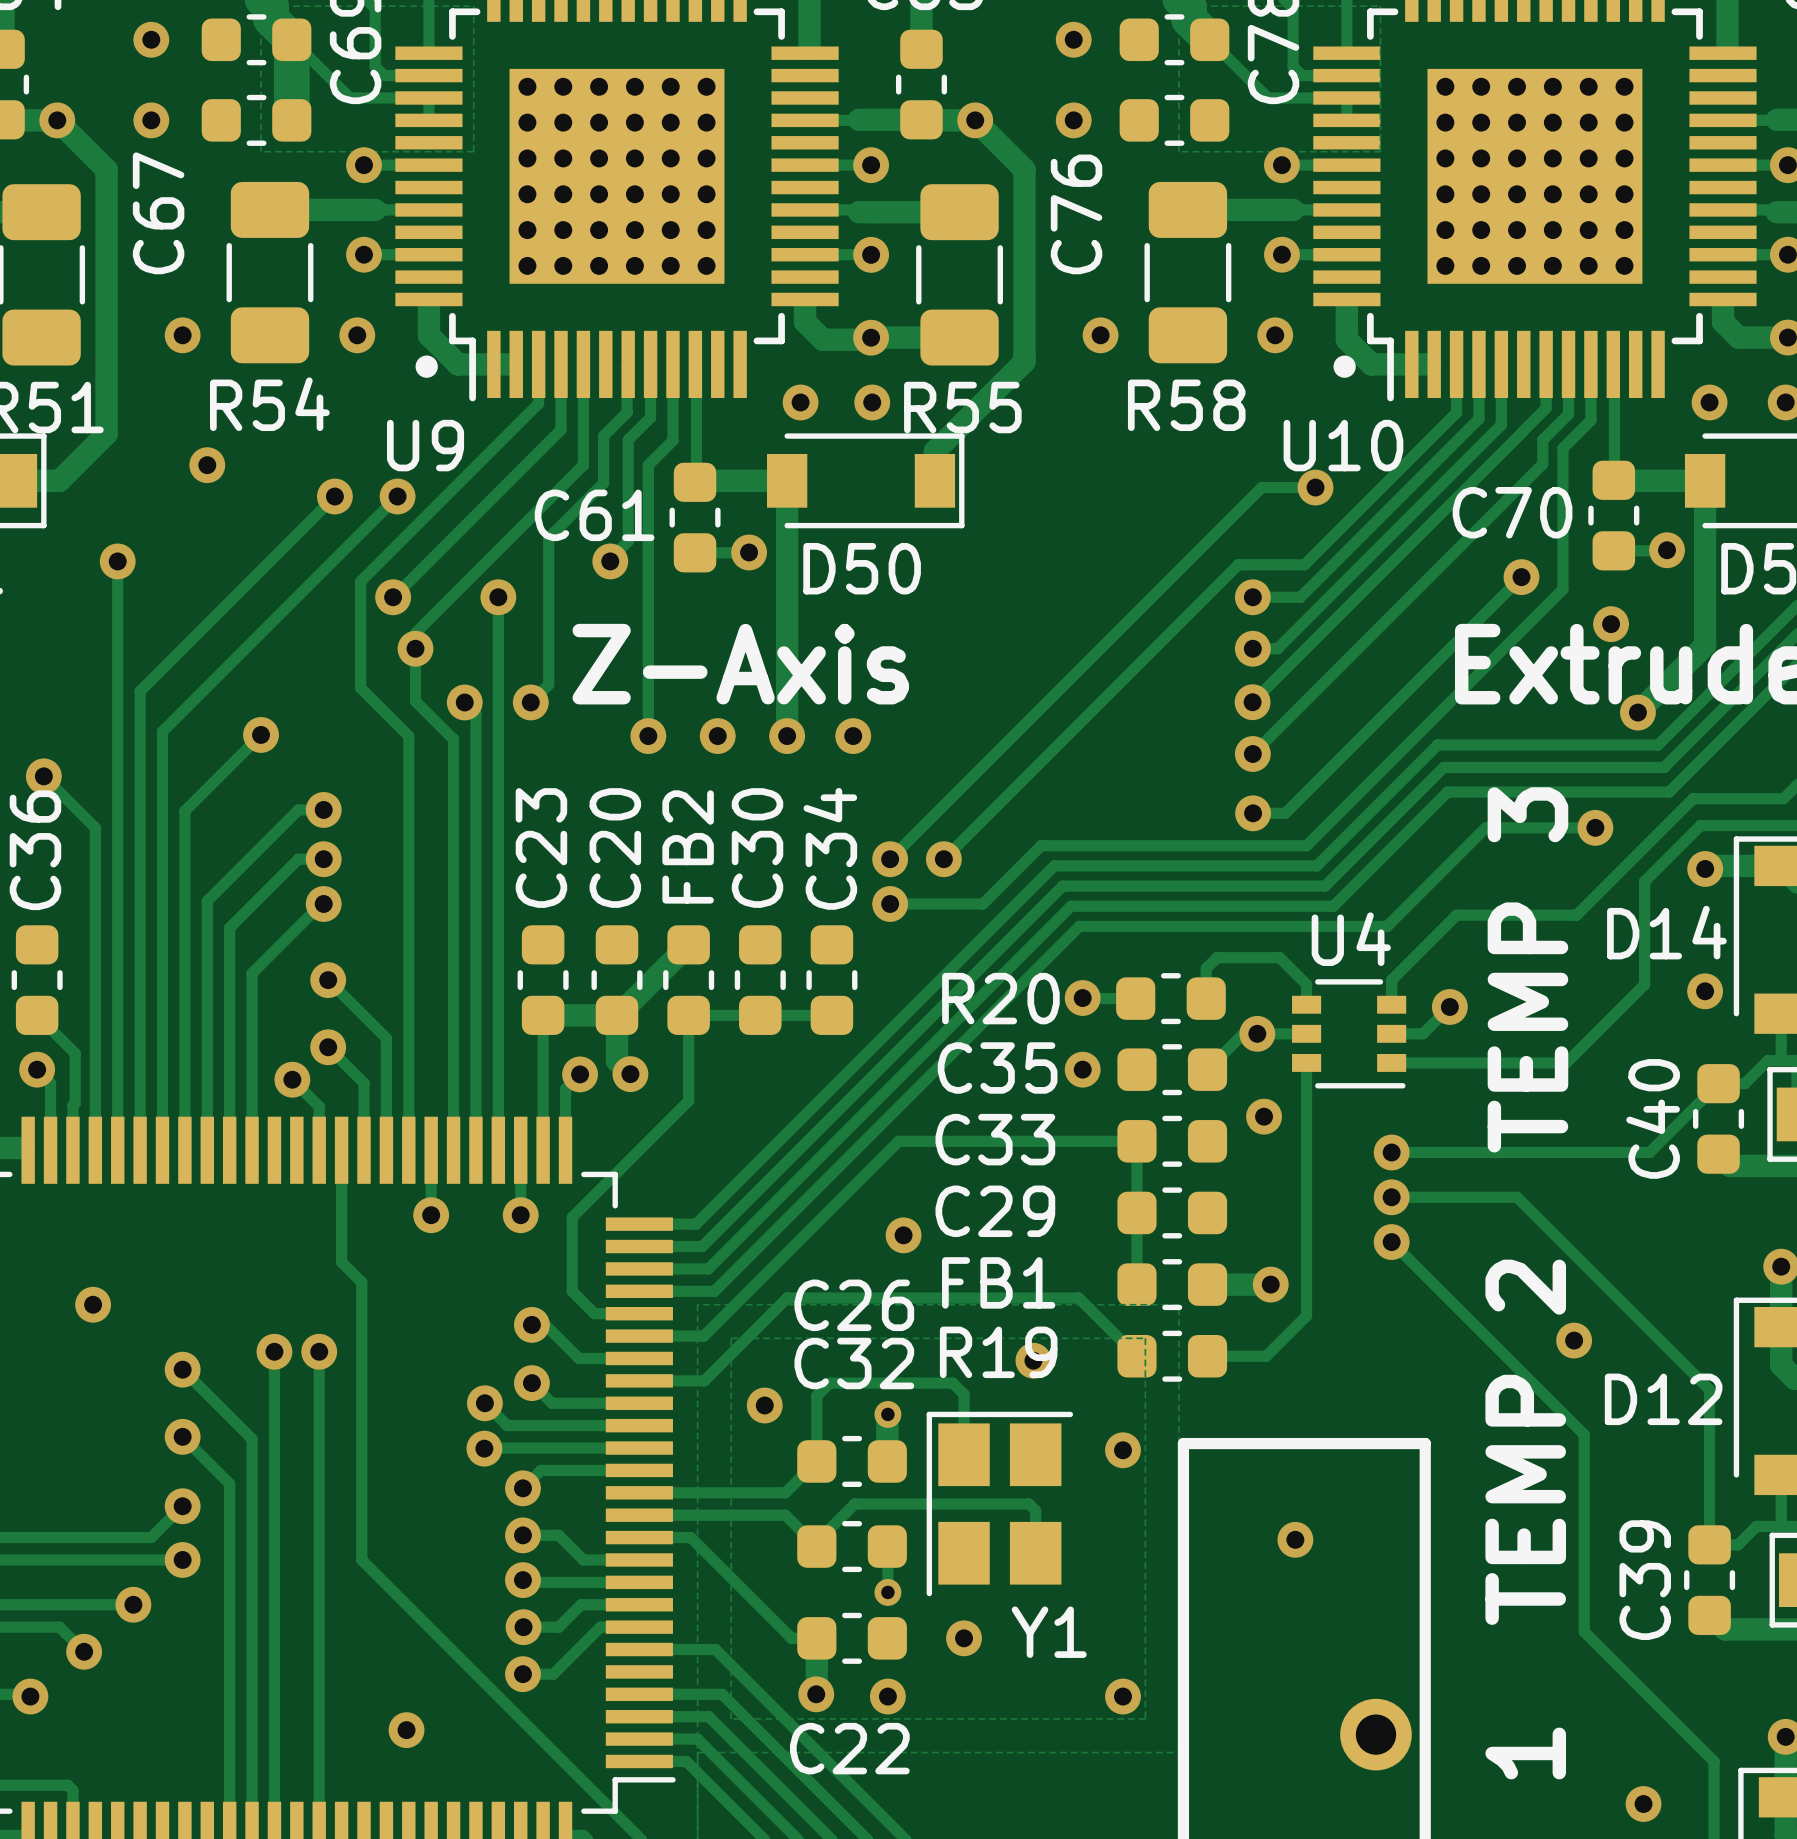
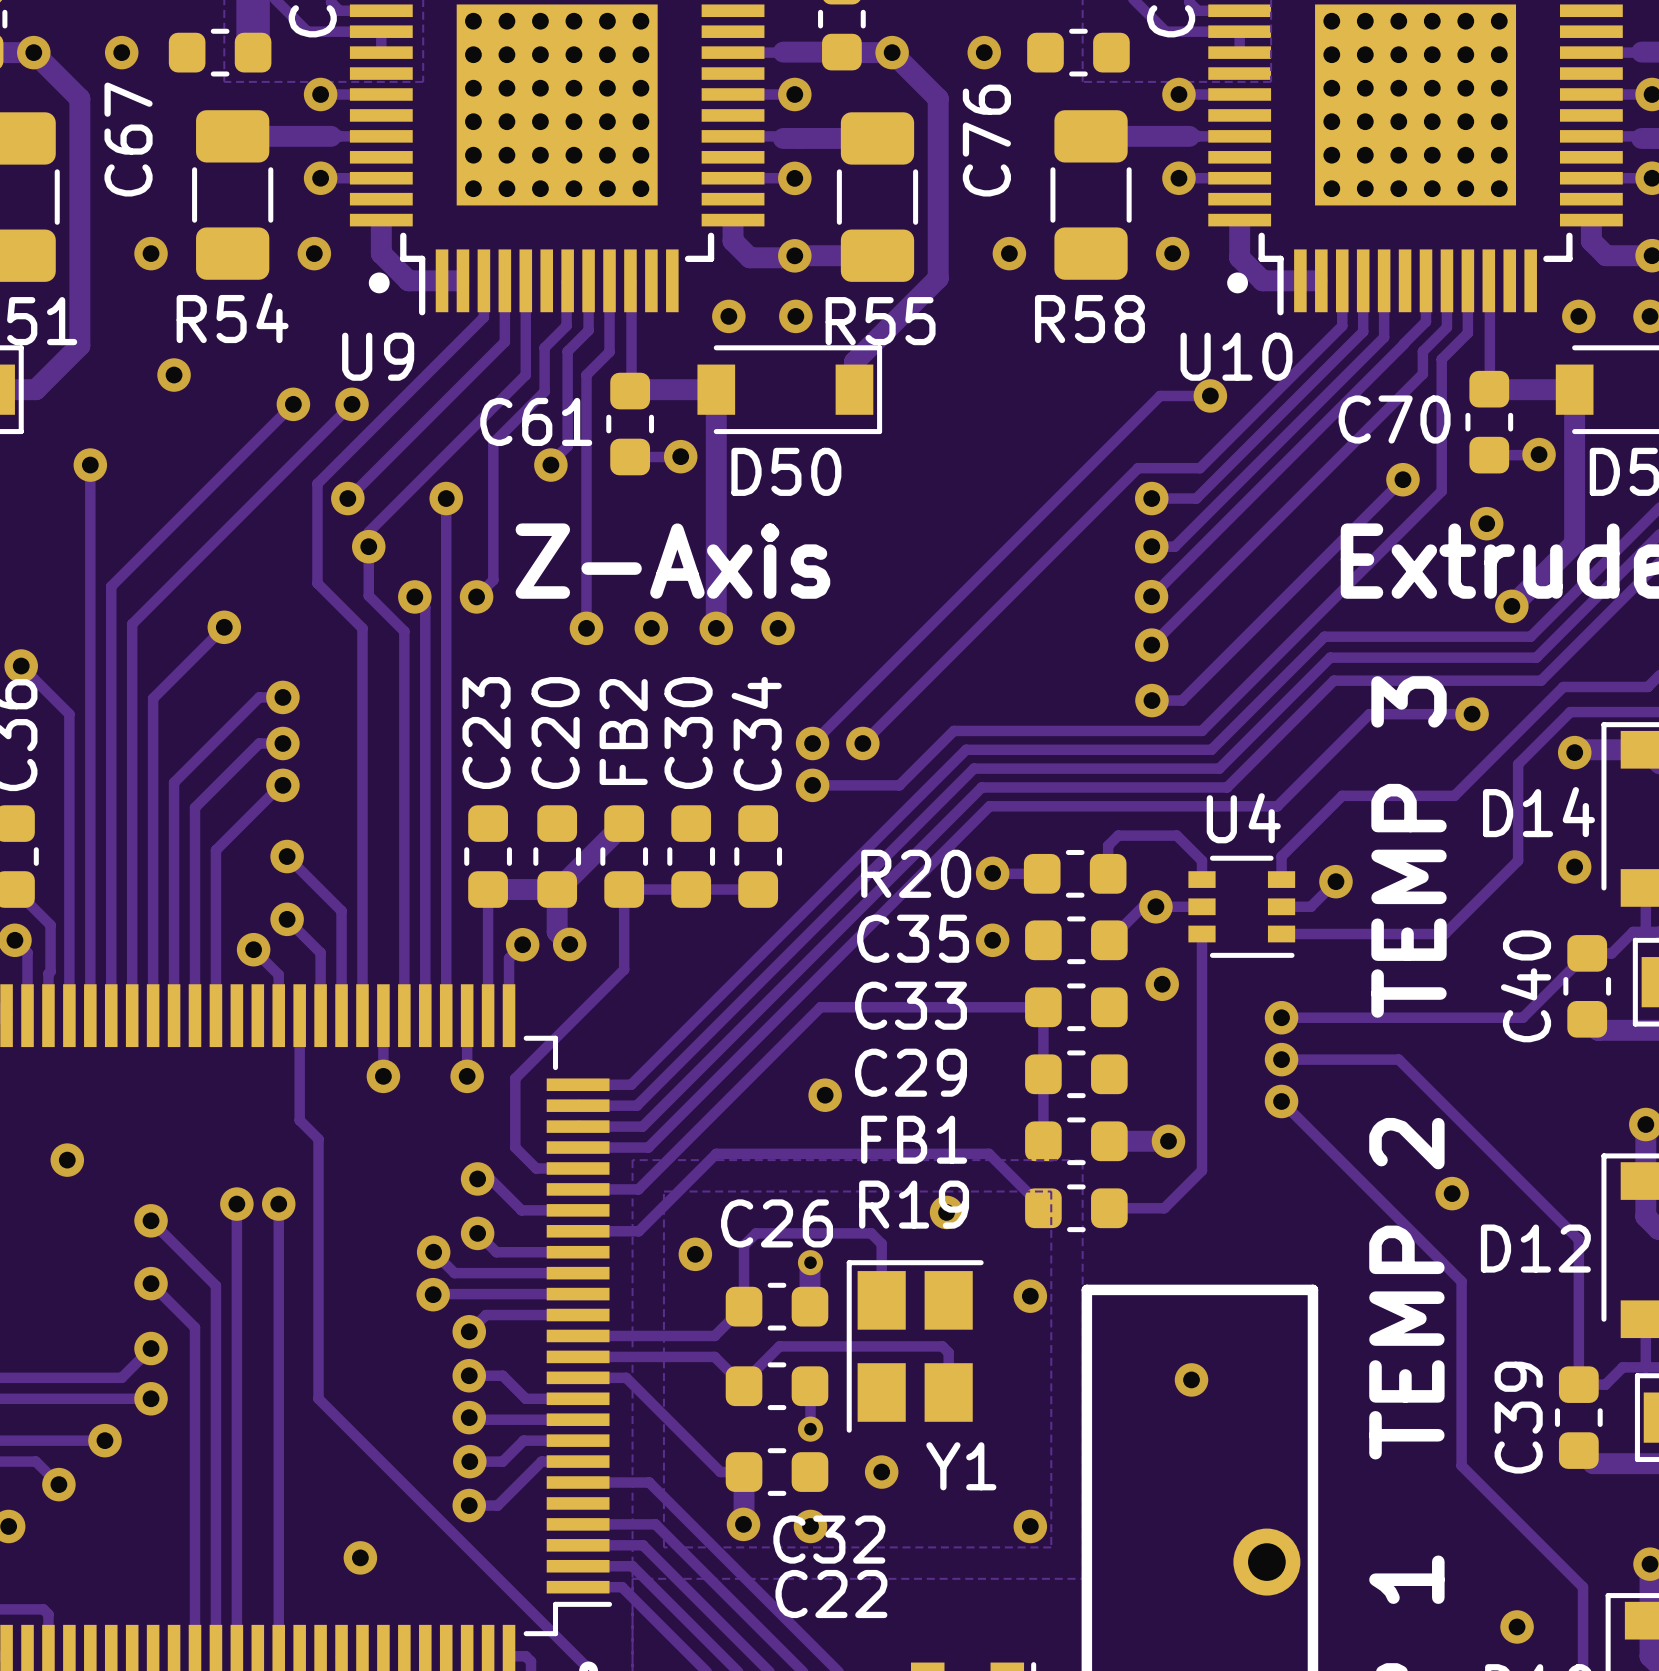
C26 name position: C26 (854, 1305) -> C26 (777, 1223)
C32 name position: C32 (854, 1363) -> C32 (829, 1539)
C22 name position: C22 (849, 1748) -> C22 (831, 1594)

